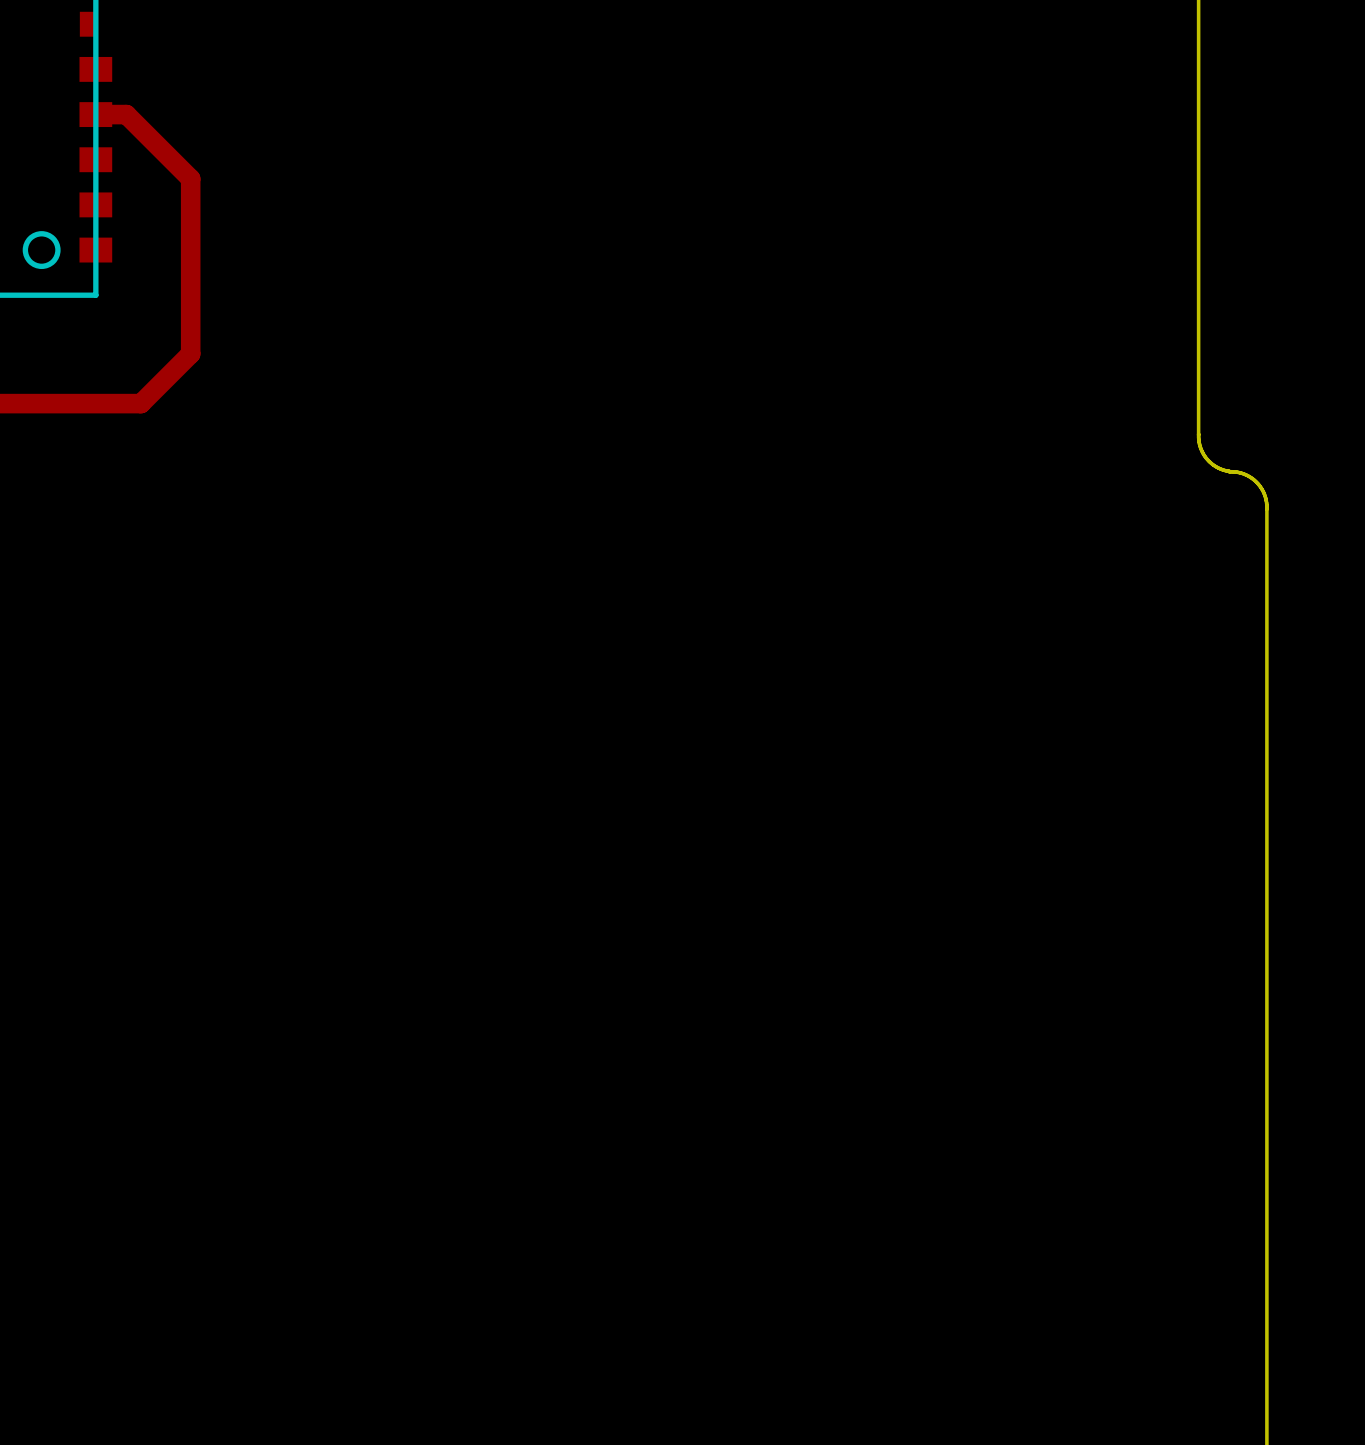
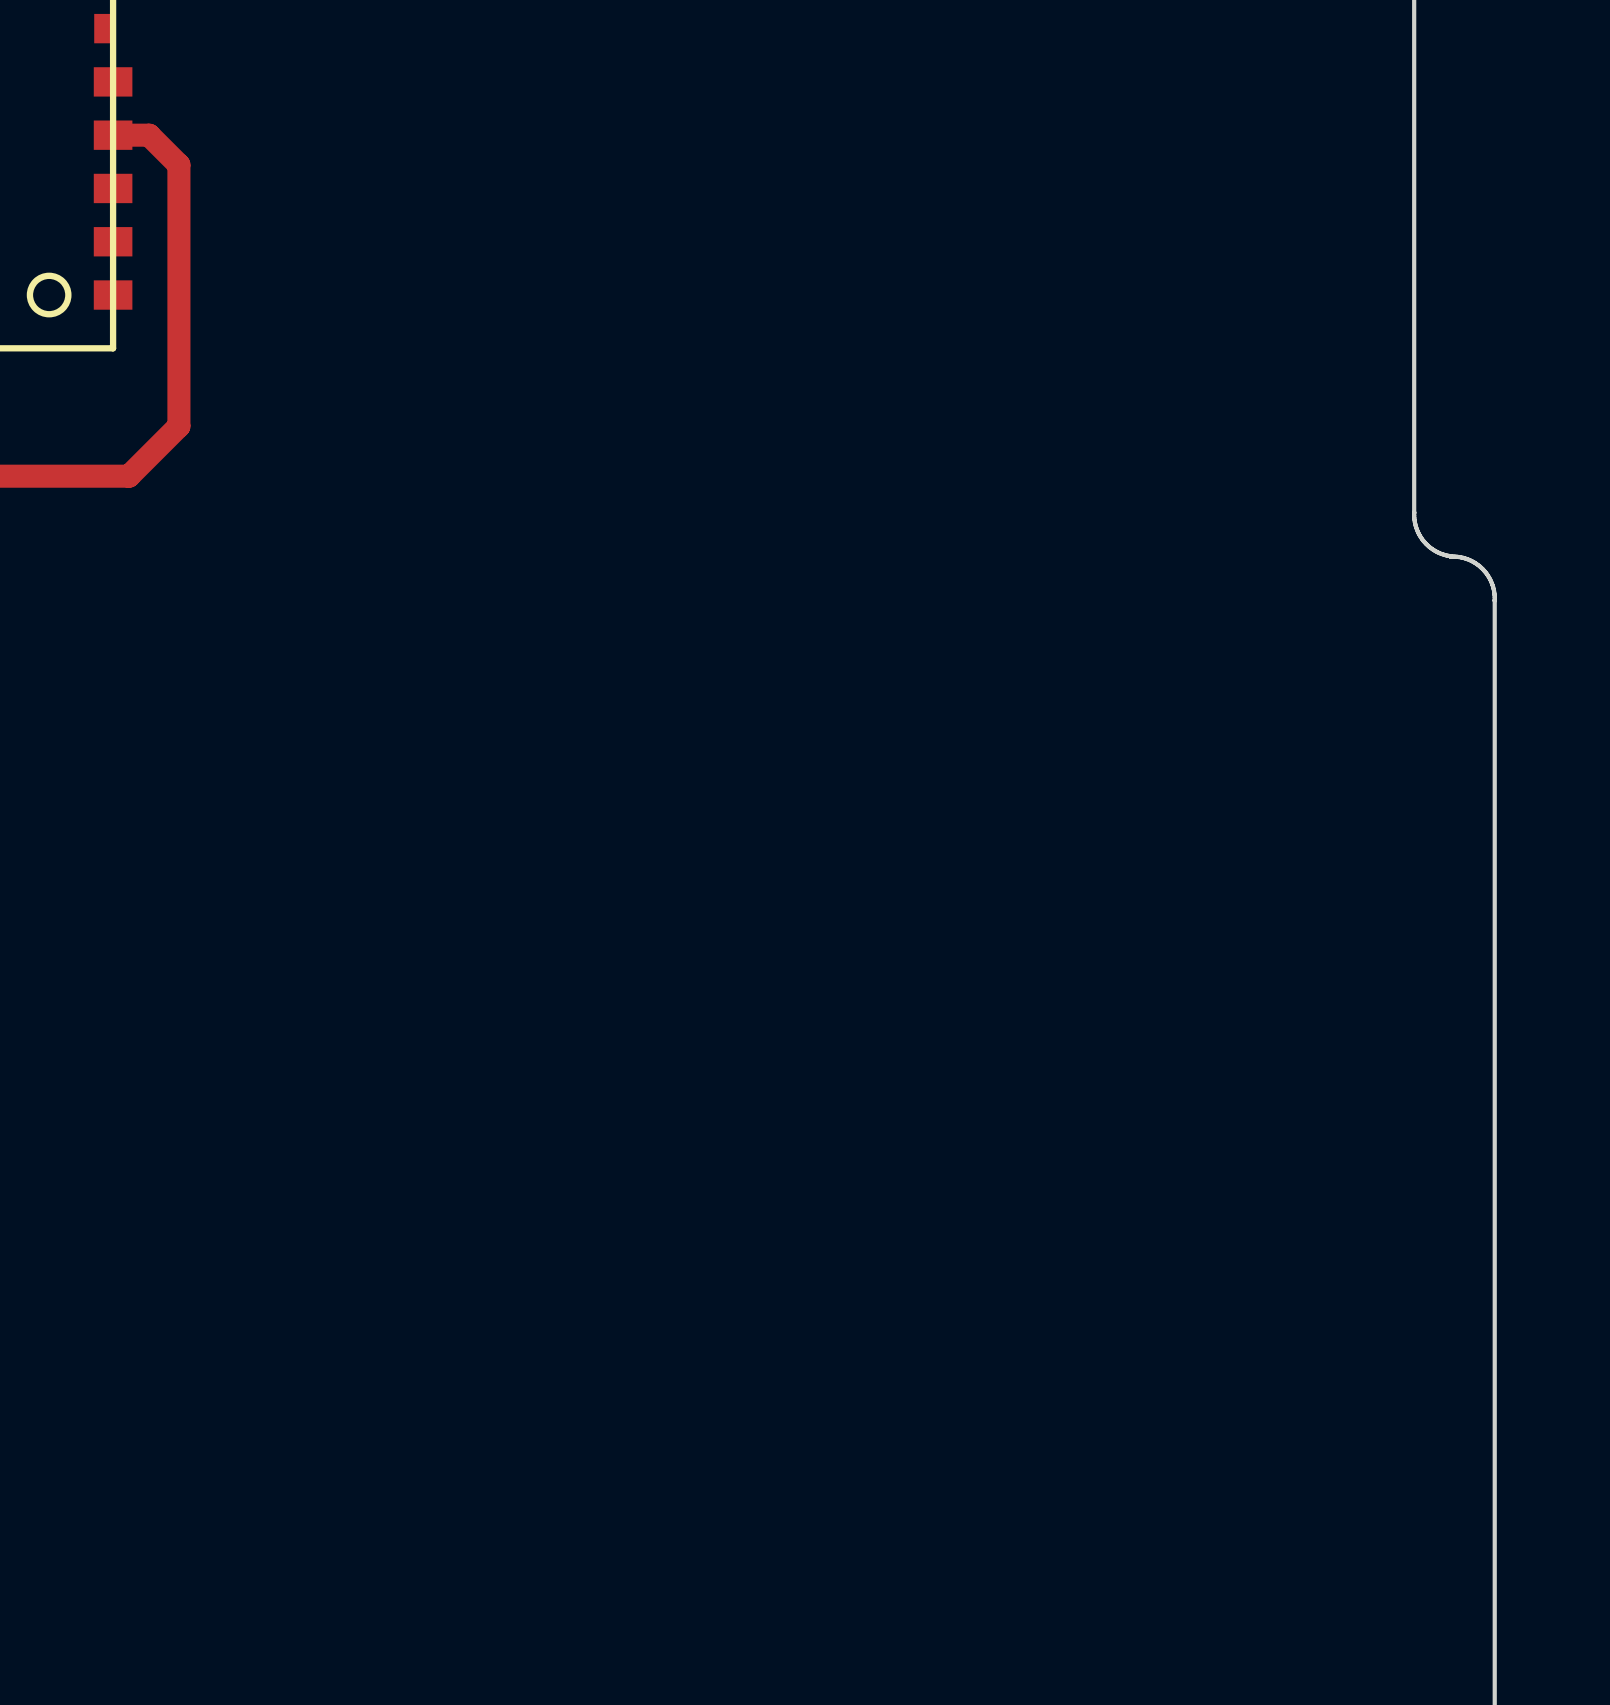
track: (151, 139) (190, 178) (190, 353) (141, 403) (109, 403) -> (178, 164) (178, 426) (128, 476)

